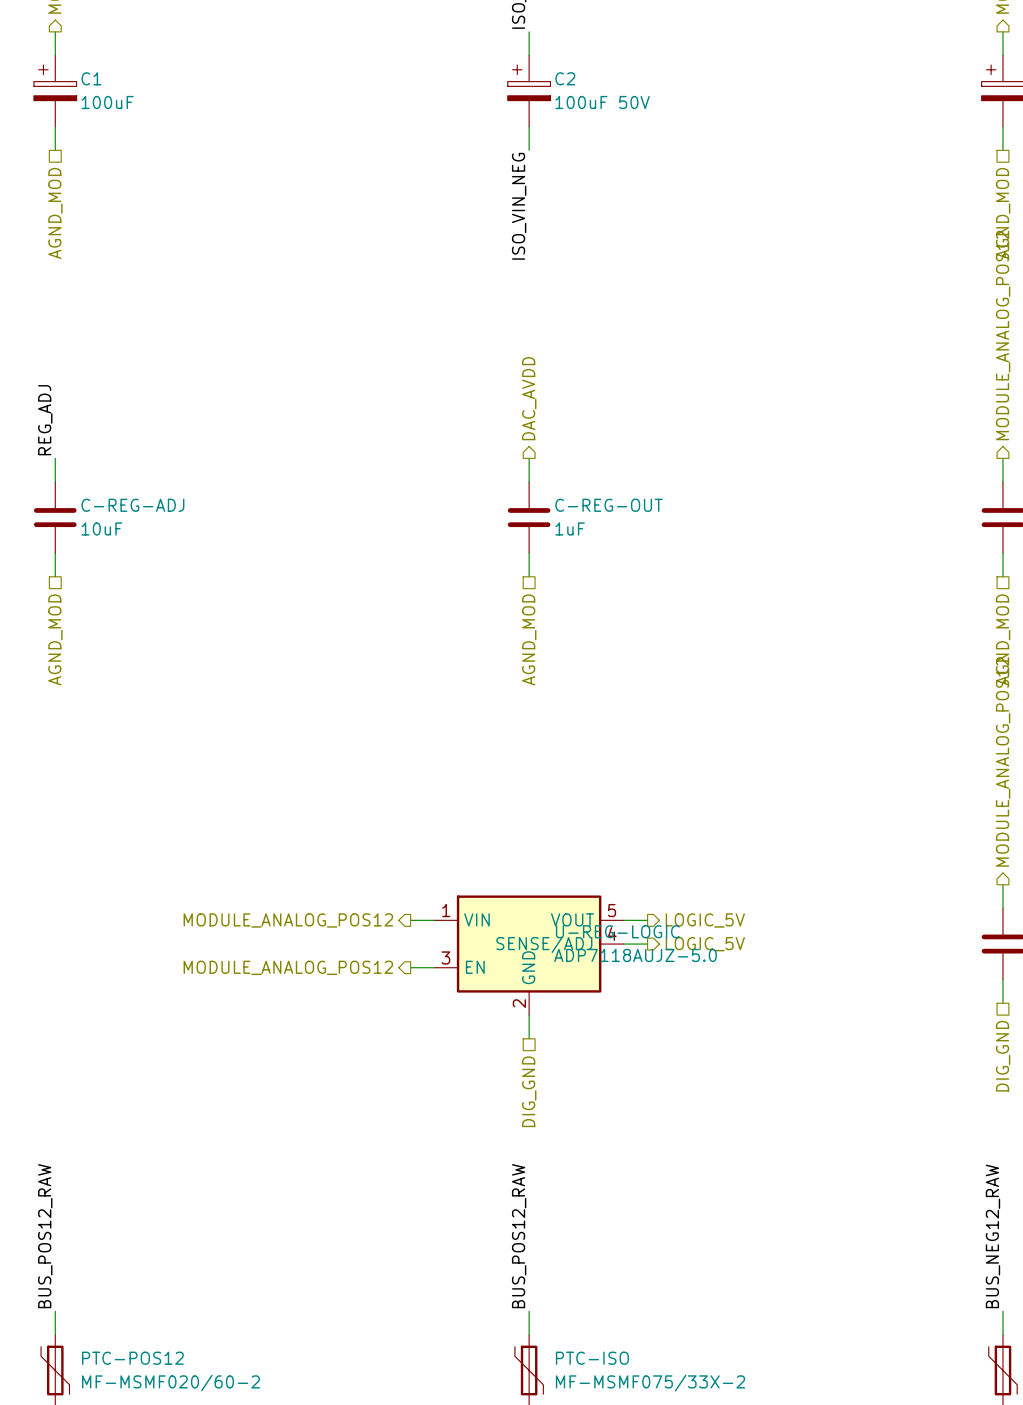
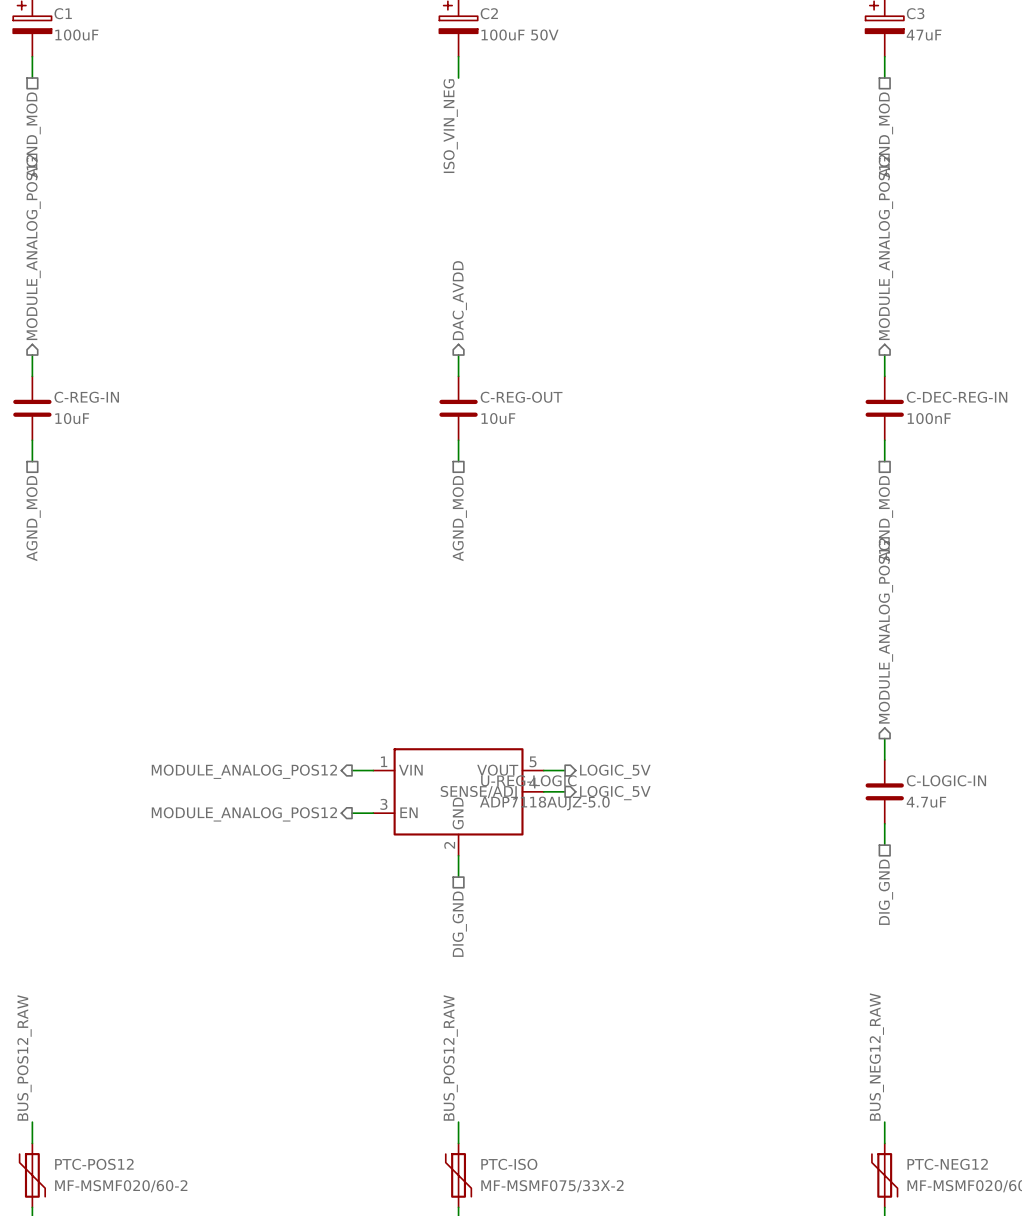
hierarchical label: none -> MODULE_ANALOG_POS12 (33, 247)
label: REG_ADJ (45, 420) -> none
C-REG-ADJ name: C-REG-ADJ (132, 505) -> C-REG-IN (86, 397)
C-REG-OUT value: 1uF (570, 528) -> 10uF (498, 418)

